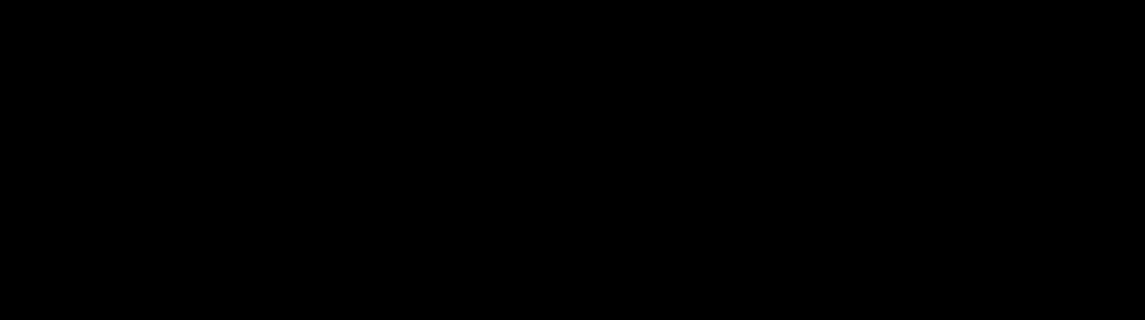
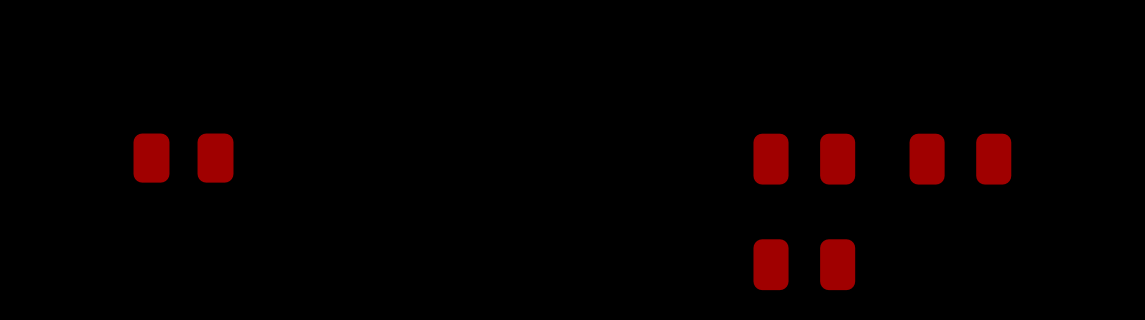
part: none -> (183, 158)
part: none -> (804, 159)
part: none -> (960, 159)
part: none -> (804, 264)

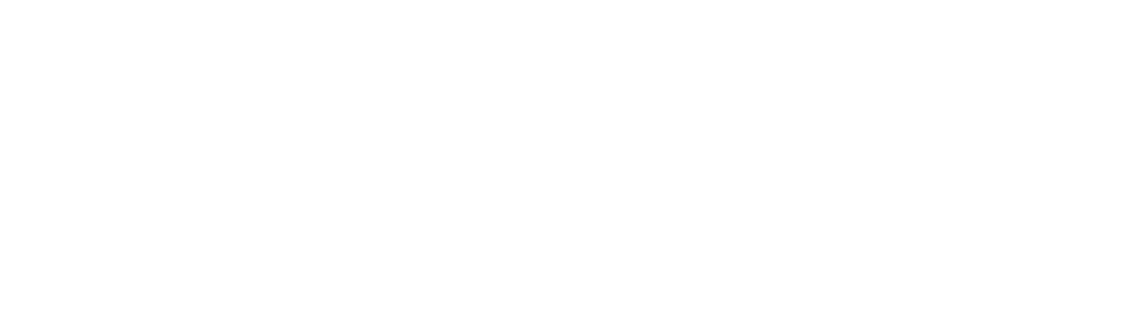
part: (183, 158) -> none
part: (804, 159) -> none
part: (960, 159) -> none
part: (804, 264) -> none

